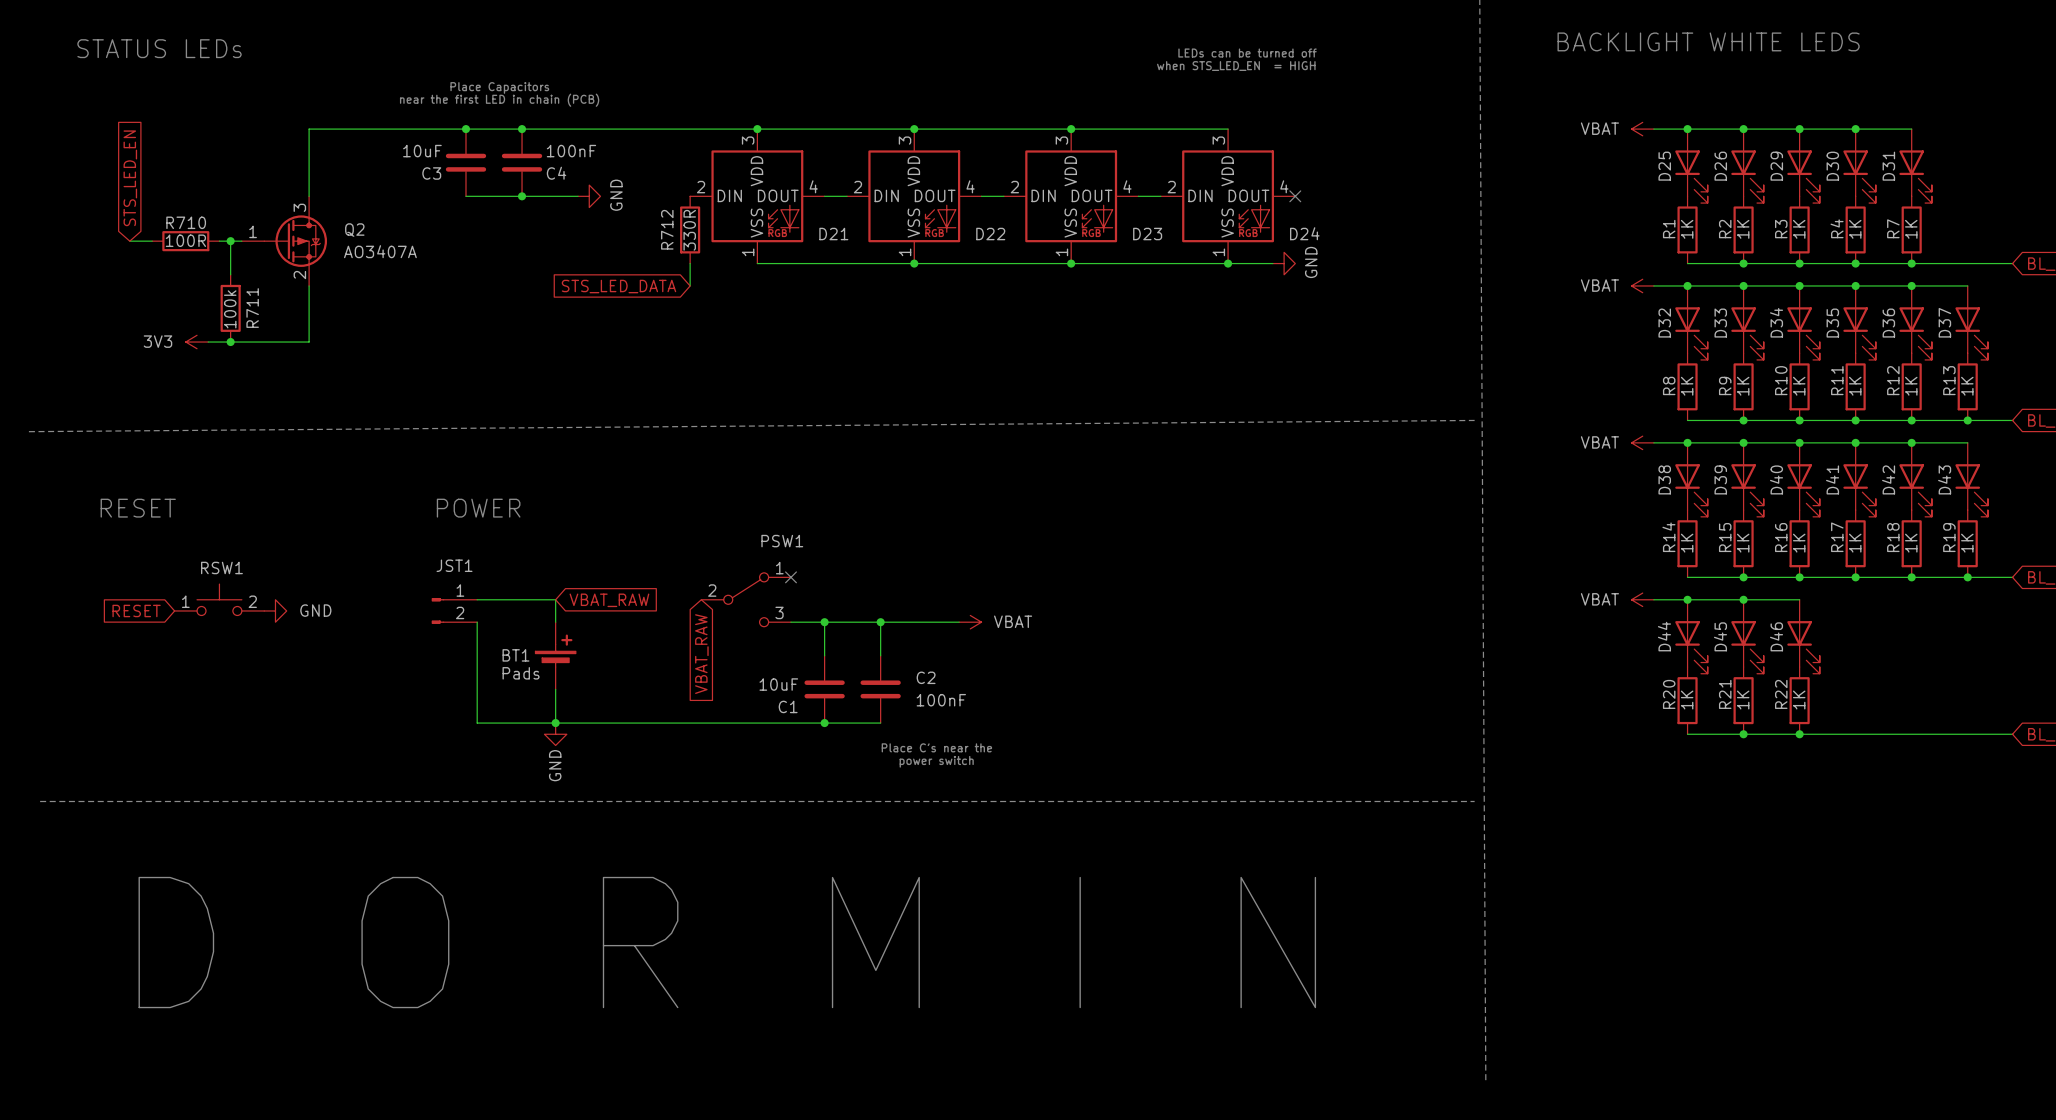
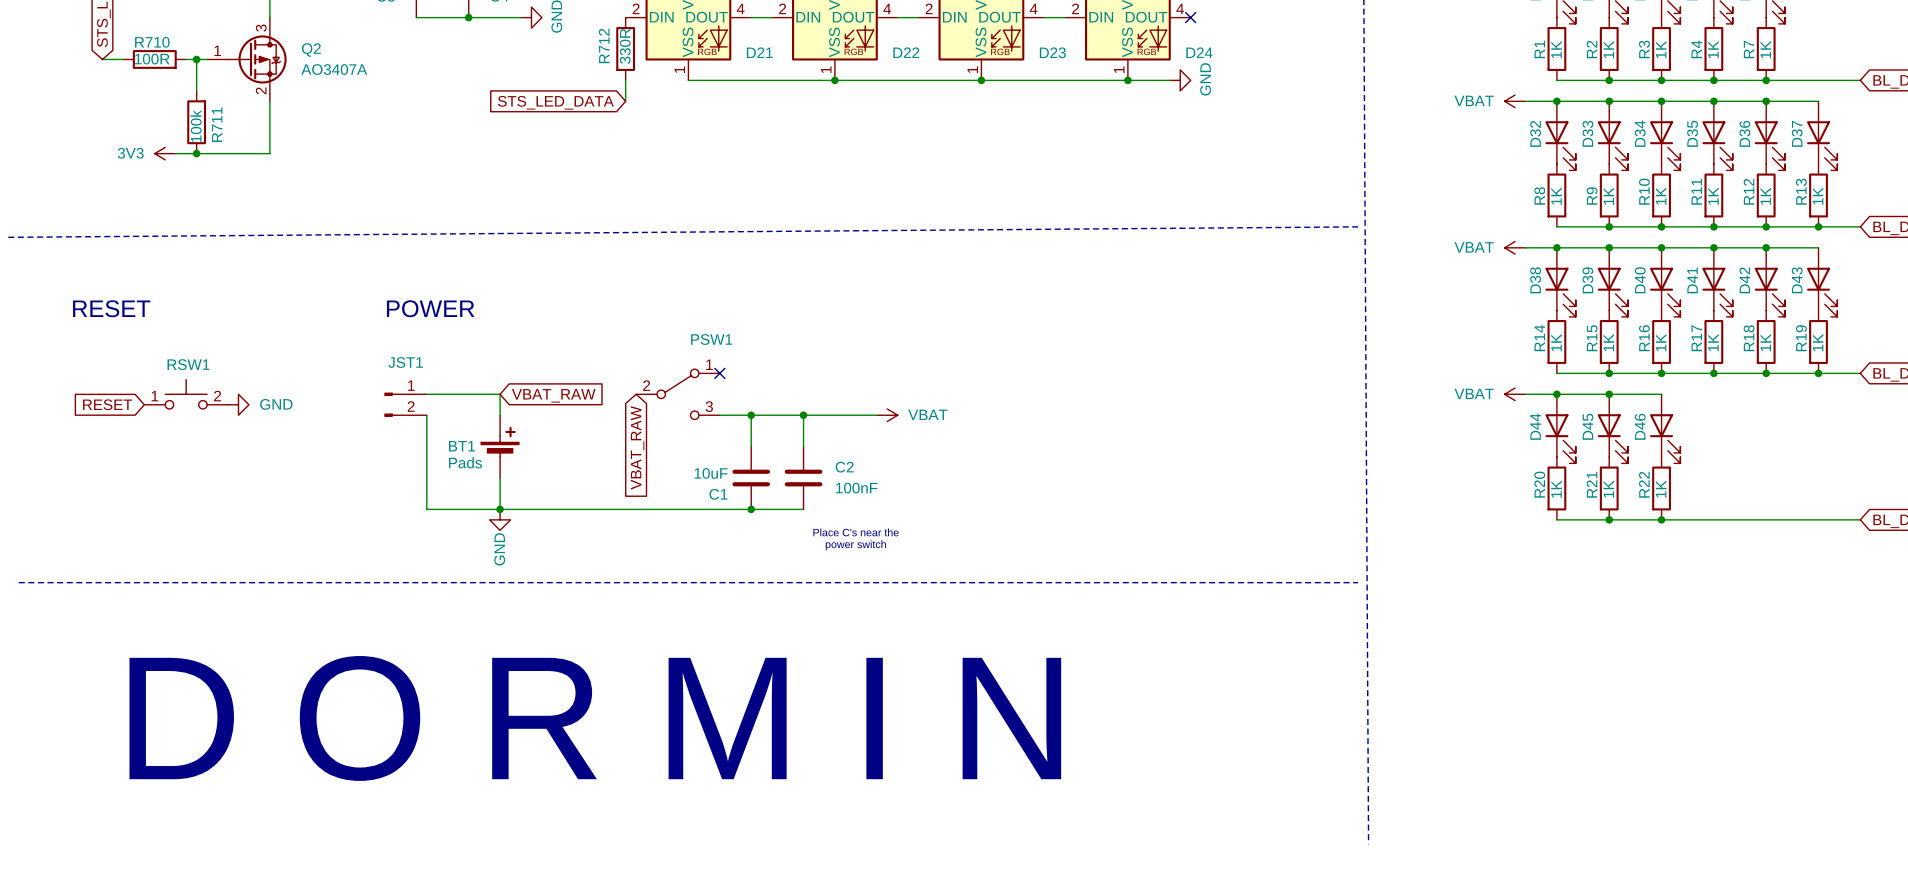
text position: D O R M I N (727, 942) -> D O R M I N (595, 718)

